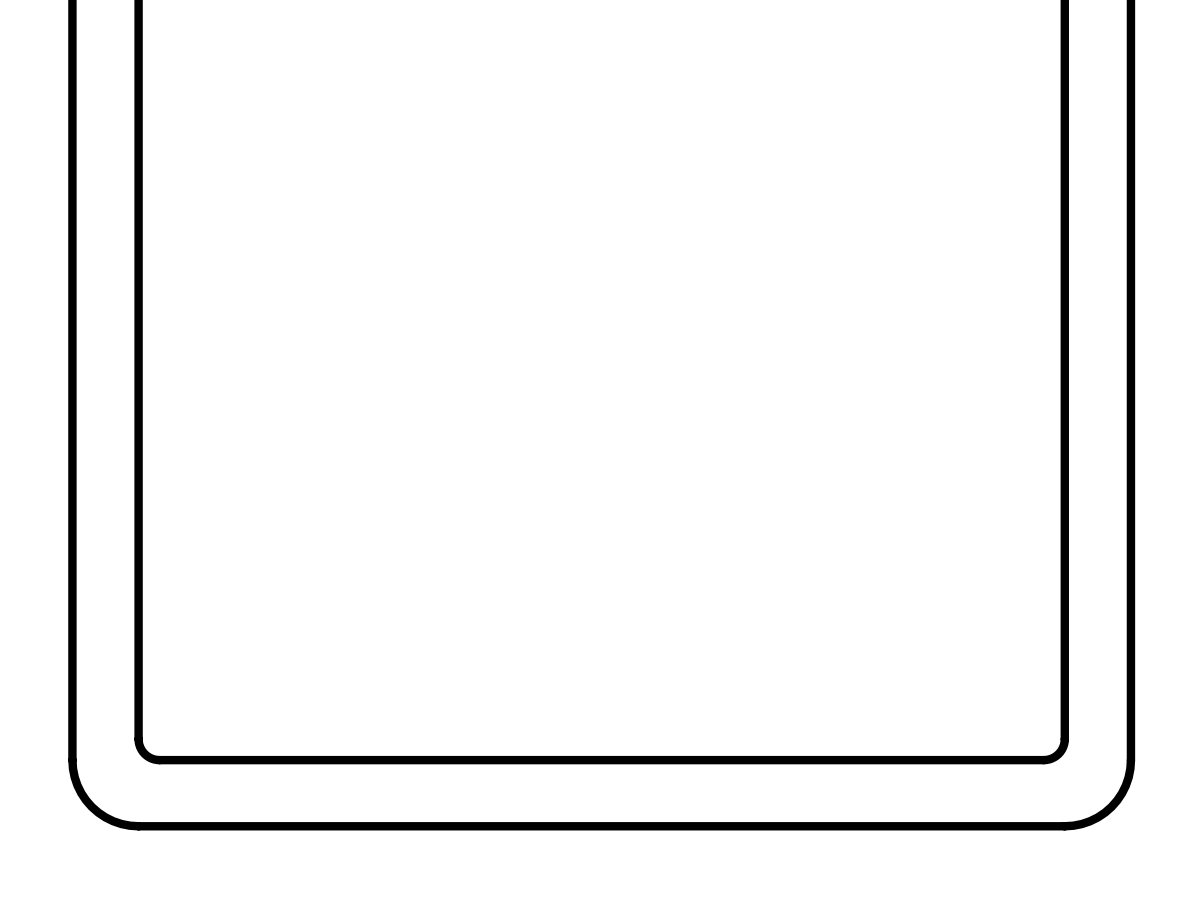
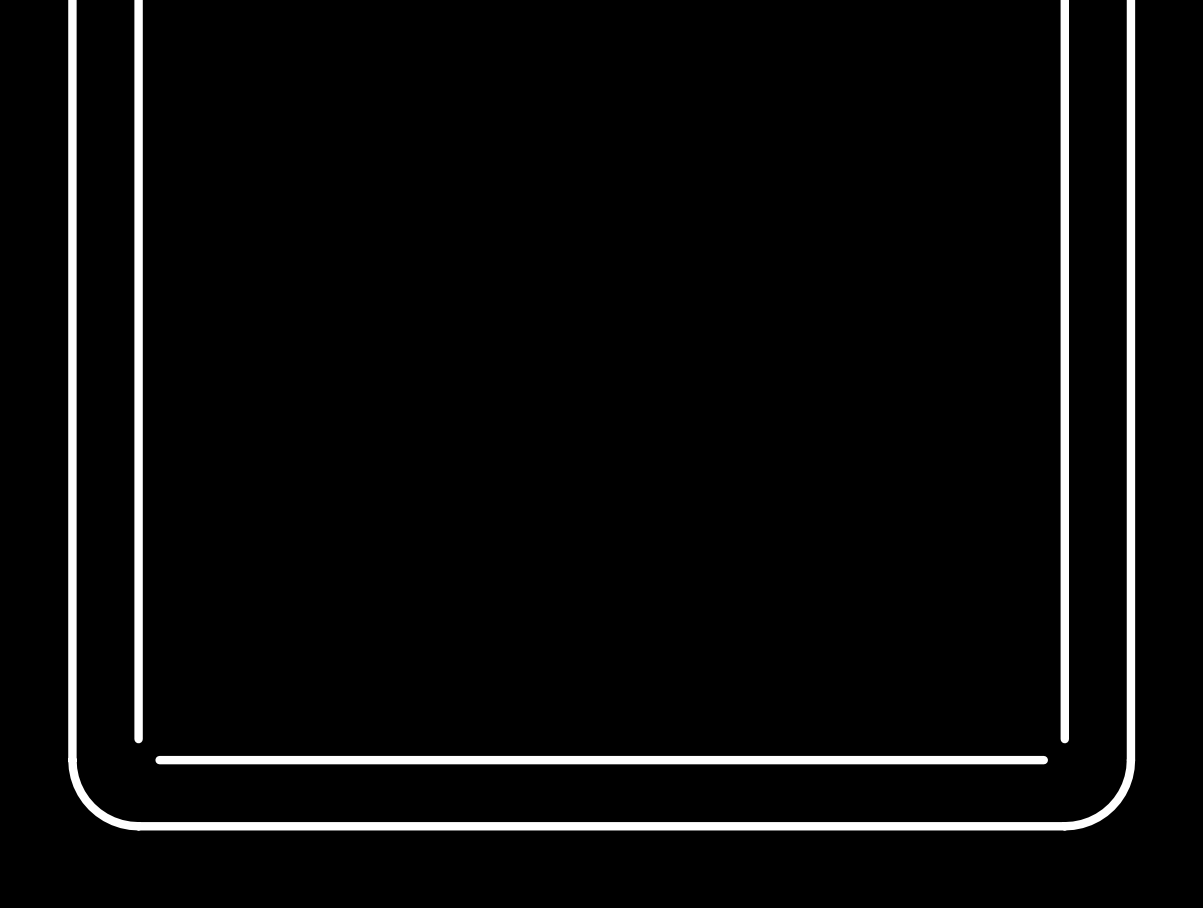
board edge: (138, 739) (140, 747) (144, 753) (151, 758) (159, 760) (156, 759) (151, 758) (146, 755) (144, 753) (142, 751) (140, 747) (138, 741) (138, 739) -> none
board edge: (1064, 739) (1063, 747) (1058, 753) (1051, 758) (1043, 760) (1046, 759) (1051, 758) (1056, 755) (1058, 753) (1060, 751) (1063, 747) (1064, 741) (1064, 739) -> none

